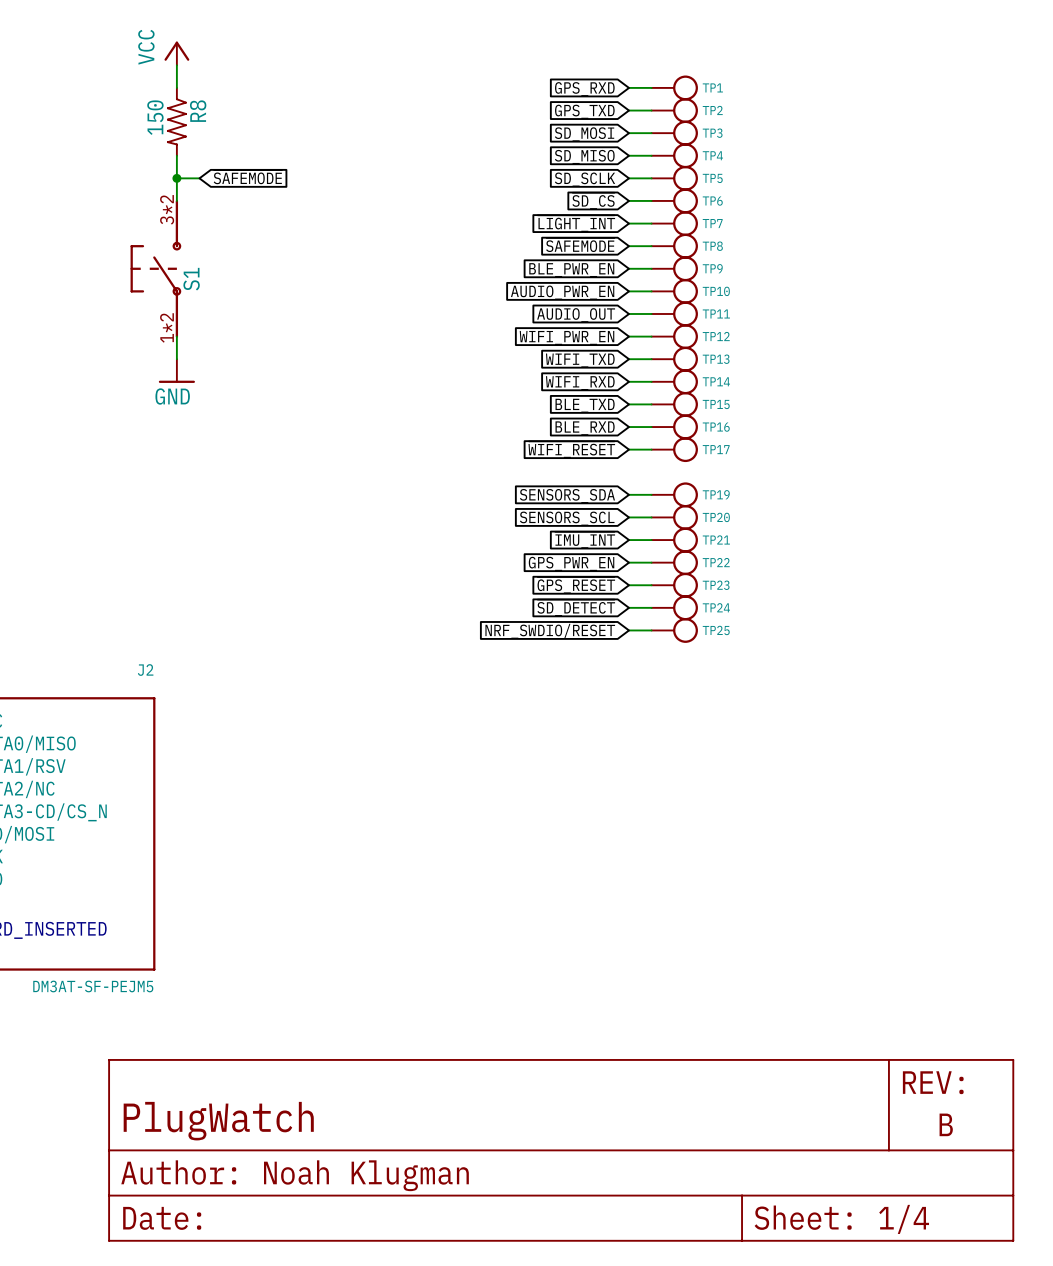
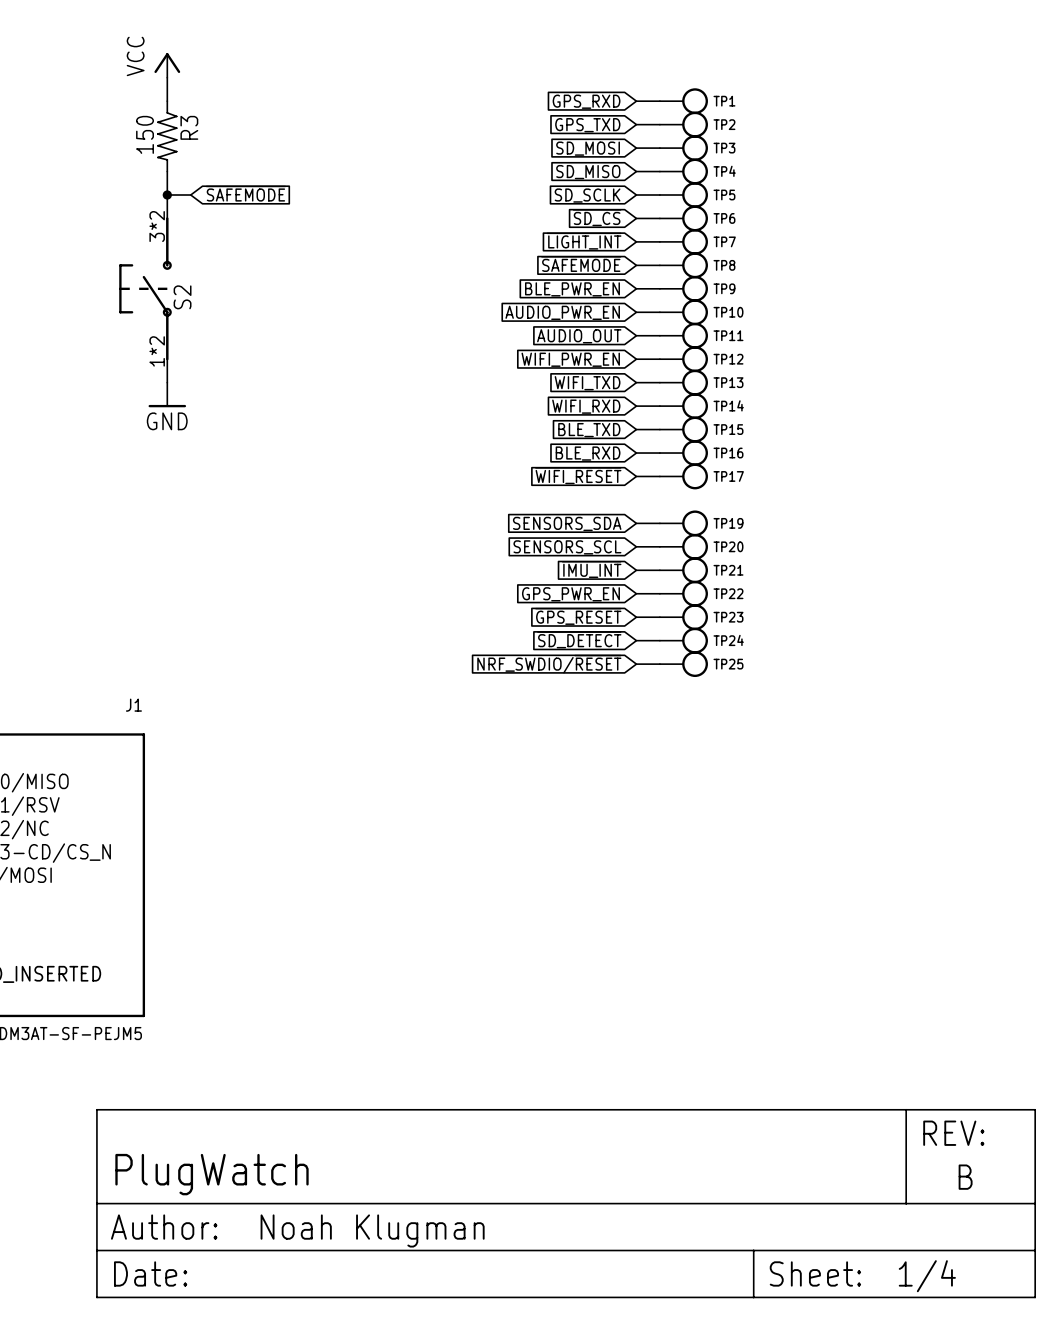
R8 name: R8 (198, 111) -> R3 (189, 127)
S1 name: S1 (191, 279) -> S2 (182, 297)
J2 name: J2 (145, 670) -> J1 (133, 705)

